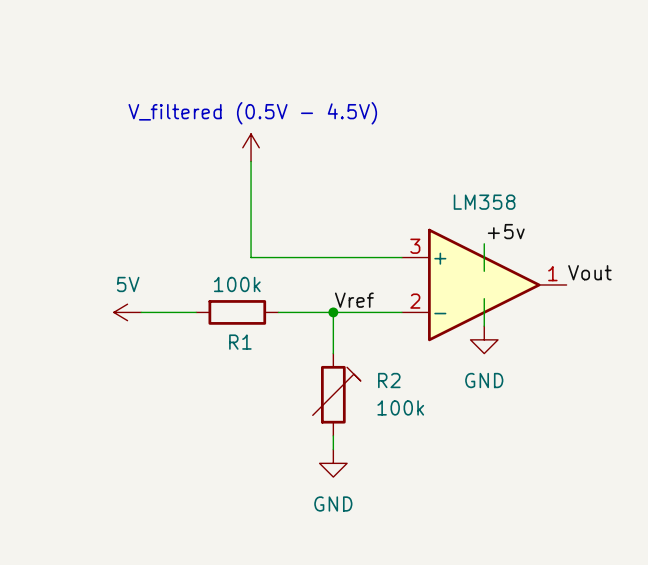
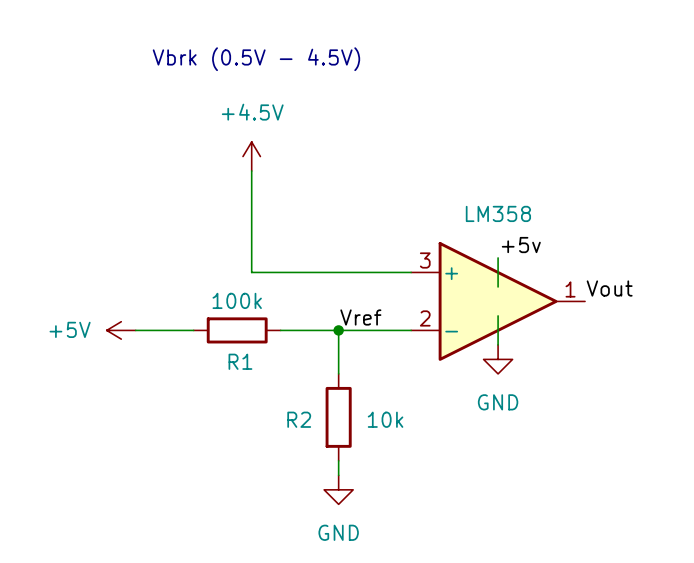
text: none -> Vbrk (0.5V - 4.5V) (256, 59)
power symbol text: none -> +4.5V (252, 112)
text: V_filtered (0.5V - 4.5V) (252, 113) -> none
power symbol: 5V (127, 312) -> +5V (121, 330)
R2 symbol: [312, 353, 361, 436] -> [325, 373, 352, 461]
R2 name position: R2 (389, 380) -> R2 (299, 419)
R2 value: 100k (400, 407) -> 10k (385, 419)

